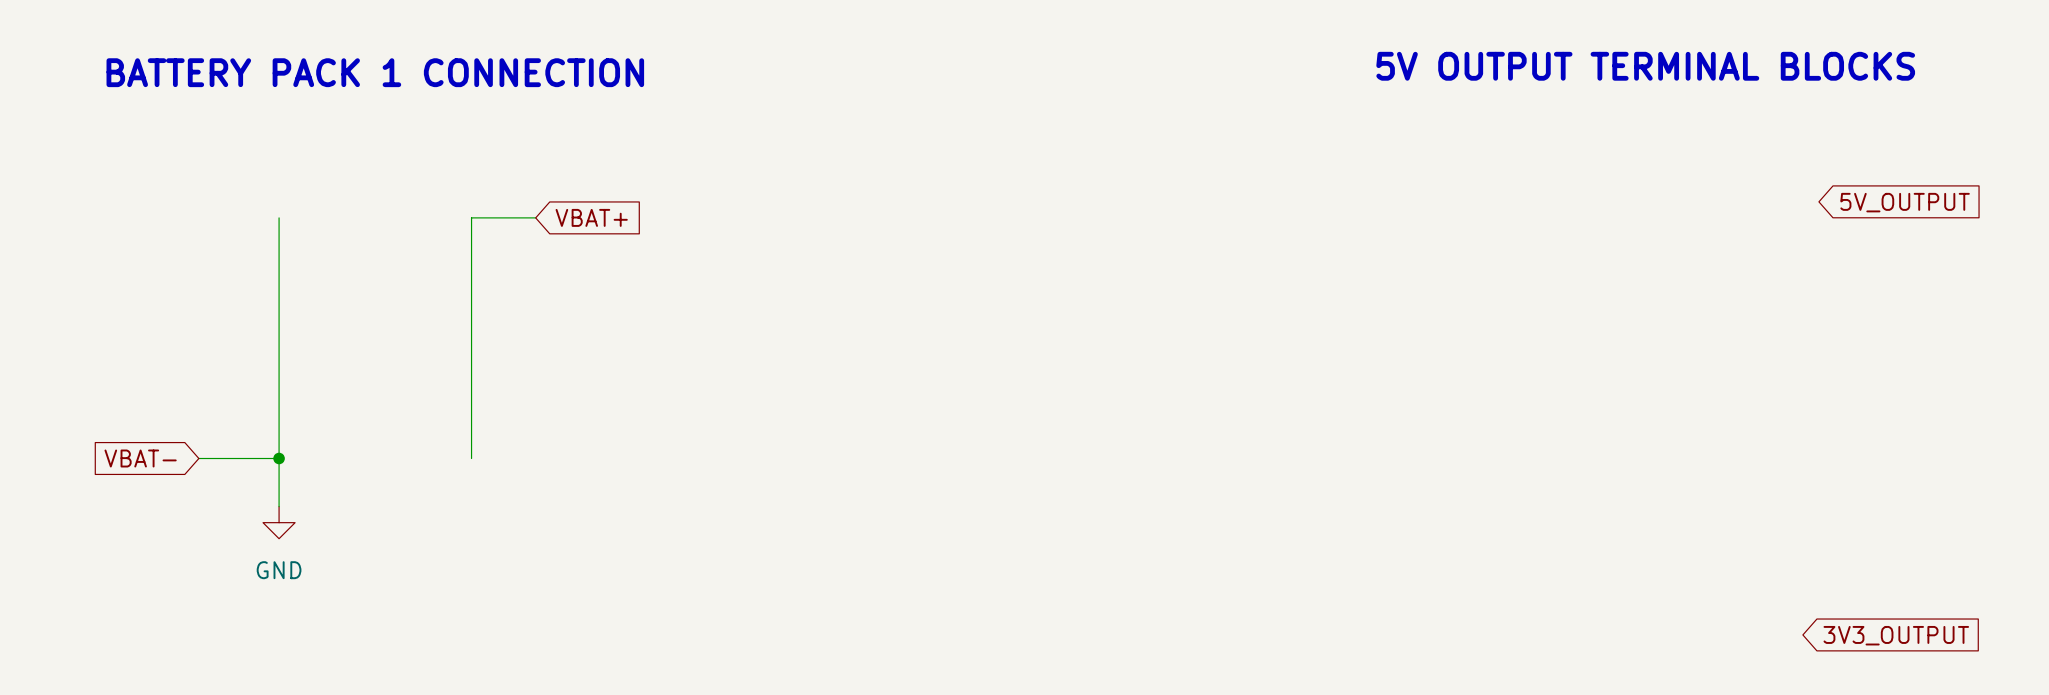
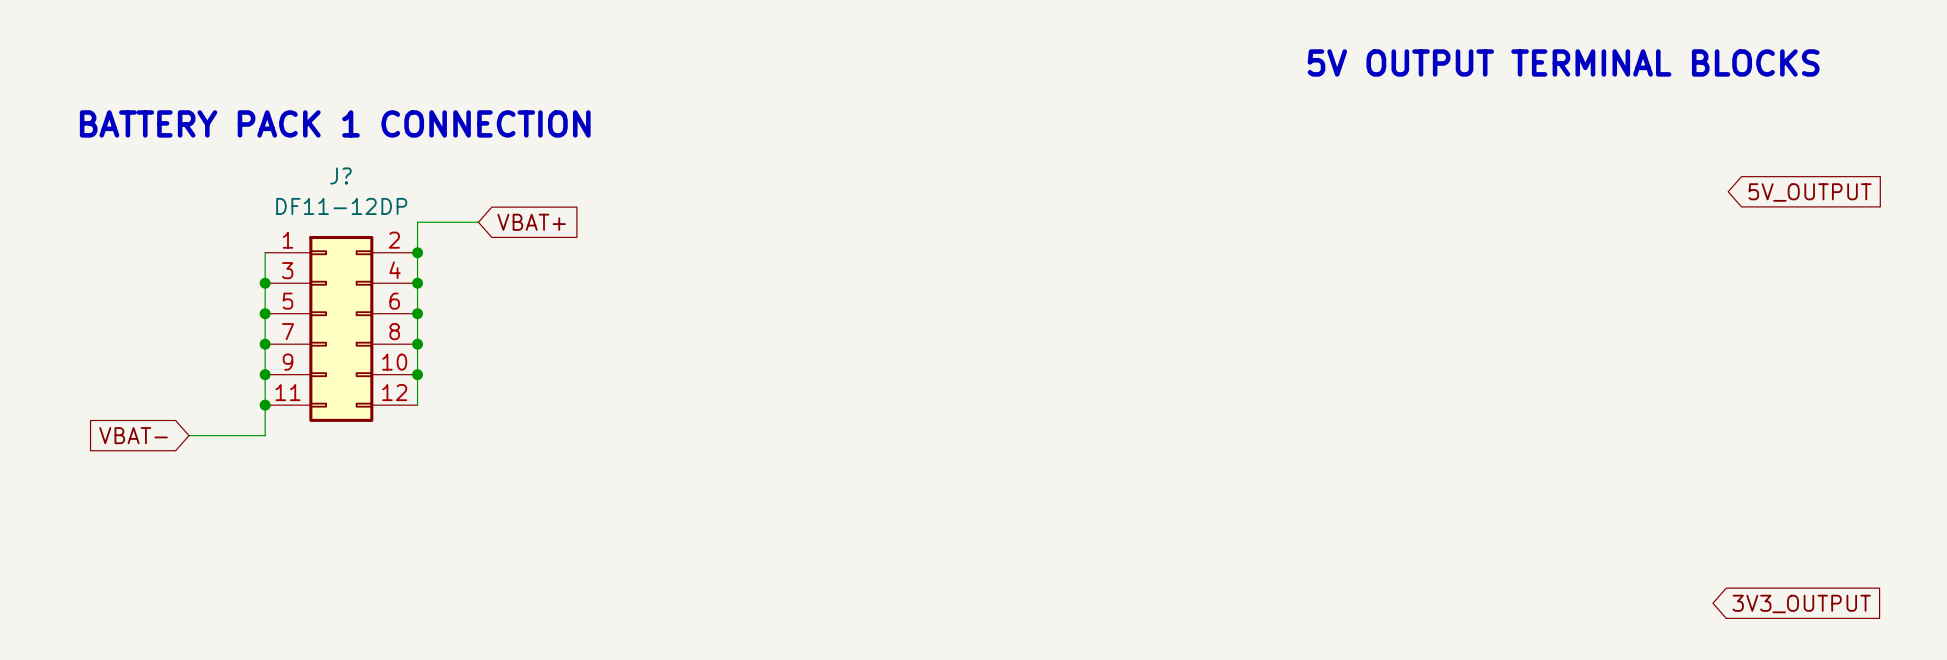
text position: BATTERY PACK 1 CONNECTION (375, 72) -> BATTERY PACK 1 CONNECTION (335, 123)
wire: (279, 217) (279, 266) -> none
wire: (535, 217) (471, 217) (471, 458) -> none
global label position: VBAT+ (591, 217) -> VBAT+ (531, 222)
wire: none -> (478, 222) (417, 222) (417, 405)
junction: none -> (417, 252)
junction: none -> (265, 283)
junction: none -> (417, 283)
junction: none -> (265, 313)
junction: none -> (417, 313)
J?: none -> DF11-12DP (341, 328)
junction: none -> (265, 344)
junction: none -> (417, 344)
junction: none -> (265, 374)
junction: none -> (417, 374)
junction: none -> (265, 405)
wire: (279, 458) (279, 506) -> none
junction: (279, 458) -> none
power symbol: GND (279, 522) -> none

